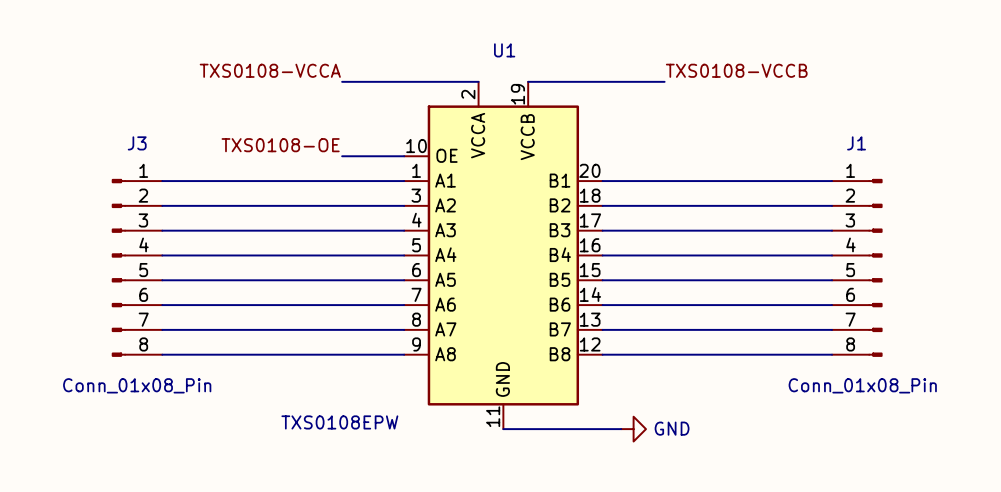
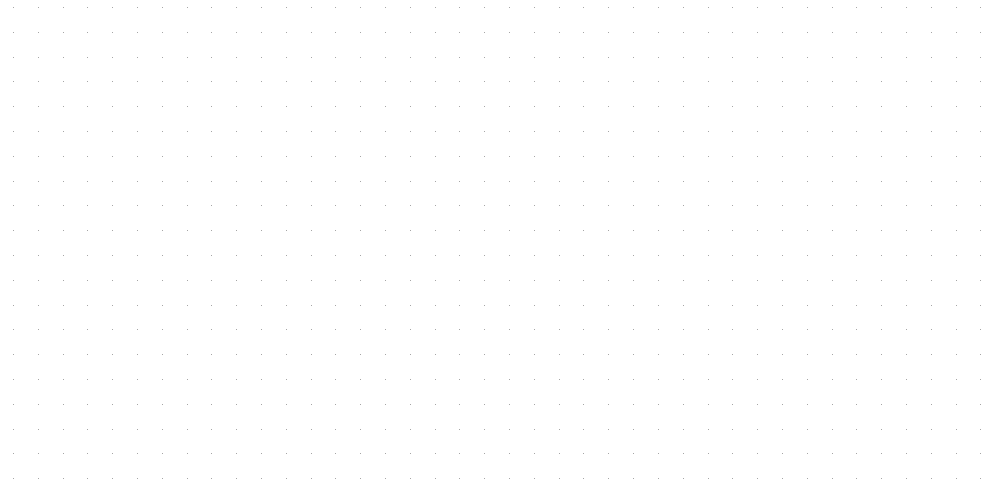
label: TXS0108-VCCA (270, 70) -> none
label: TXS0108-VCCB (736, 70) -> none
wire: (342, 81) (478, 81) -> none
wire: (528, 81) (664, 81) -> none
label: TXS0108-OE (280, 145) -> none
wire: (342, 156) (404, 156) -> none
wire: (162, 181) (404, 181) -> none
wire: (602, 181) (832, 181) -> none
wire: (162, 205) (404, 205) -> none
wire: (602, 205) (832, 205) -> none
wire: (162, 230) (404, 230) -> none
wire: (602, 230) (832, 230) -> none
wire: (162, 255) (404, 255) -> none
U1: TXS0108EPW (503, 255) -> none
wire: (602, 255) (832, 255) -> none
J3: Conn_01x08_Pin (137, 267) -> none
J1: Conn_01x08_Pin (857, 267) -> none
wire: (162, 280) (404, 280) -> none
wire: (602, 280) (832, 280) -> none
wire: (162, 305) (404, 305) -> none
wire: (602, 305) (832, 305) -> none
wire: (162, 329) (404, 329) -> none
wire: (602, 329) (832, 329) -> none
wire: (162, 354) (404, 354) -> none
wire: (602, 354) (832, 354) -> none
wire: (503, 429) (621, 429) -> none
power symbol: GND (633, 429) -> none

